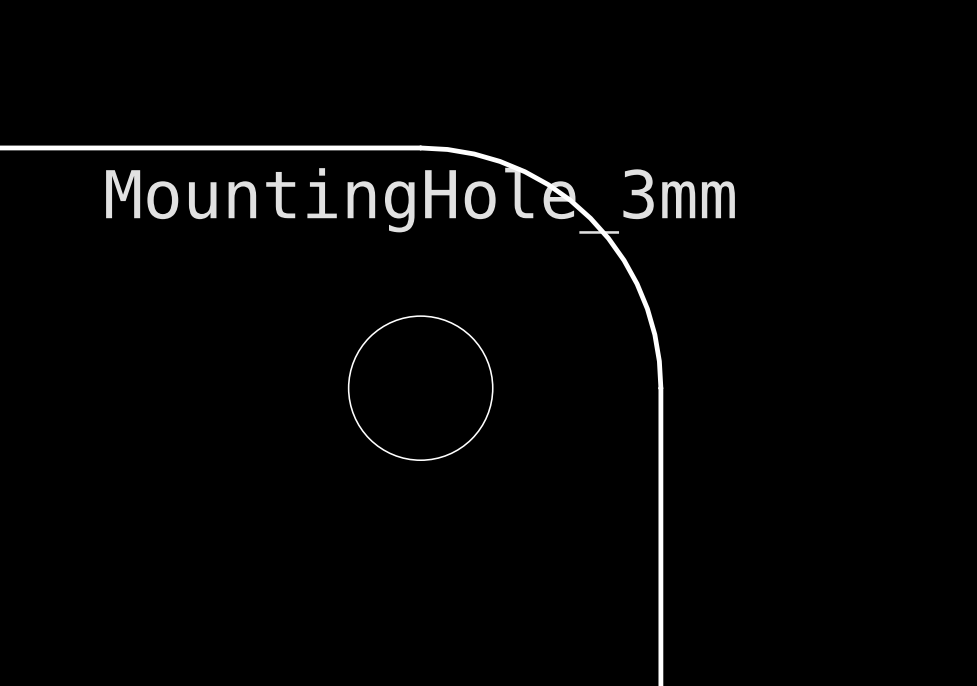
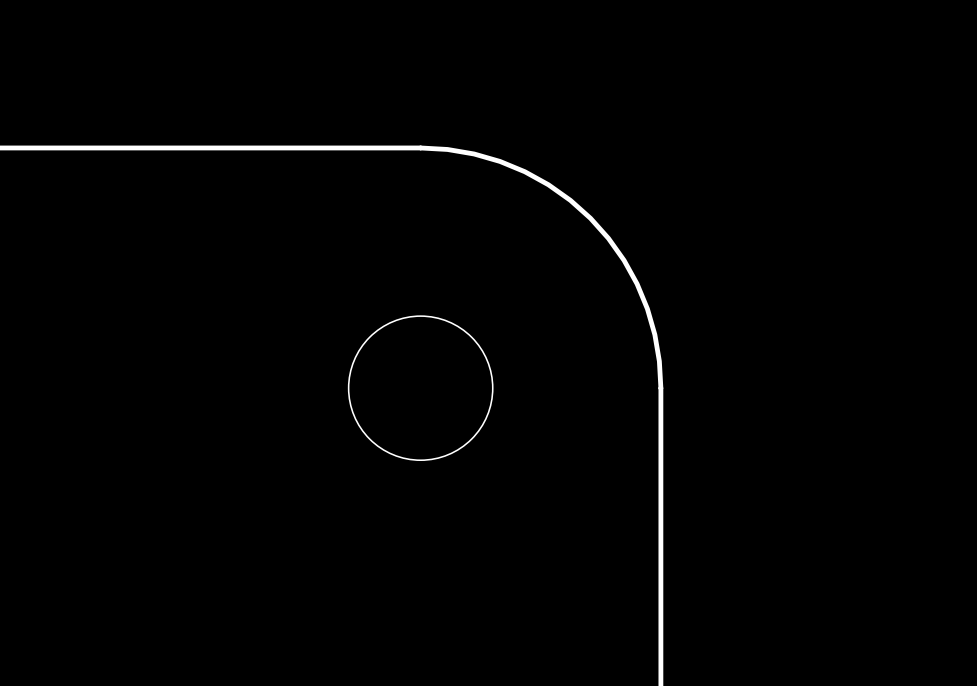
MountingHole_3mm name: MountingHole_3mm (420, 200) -> none

